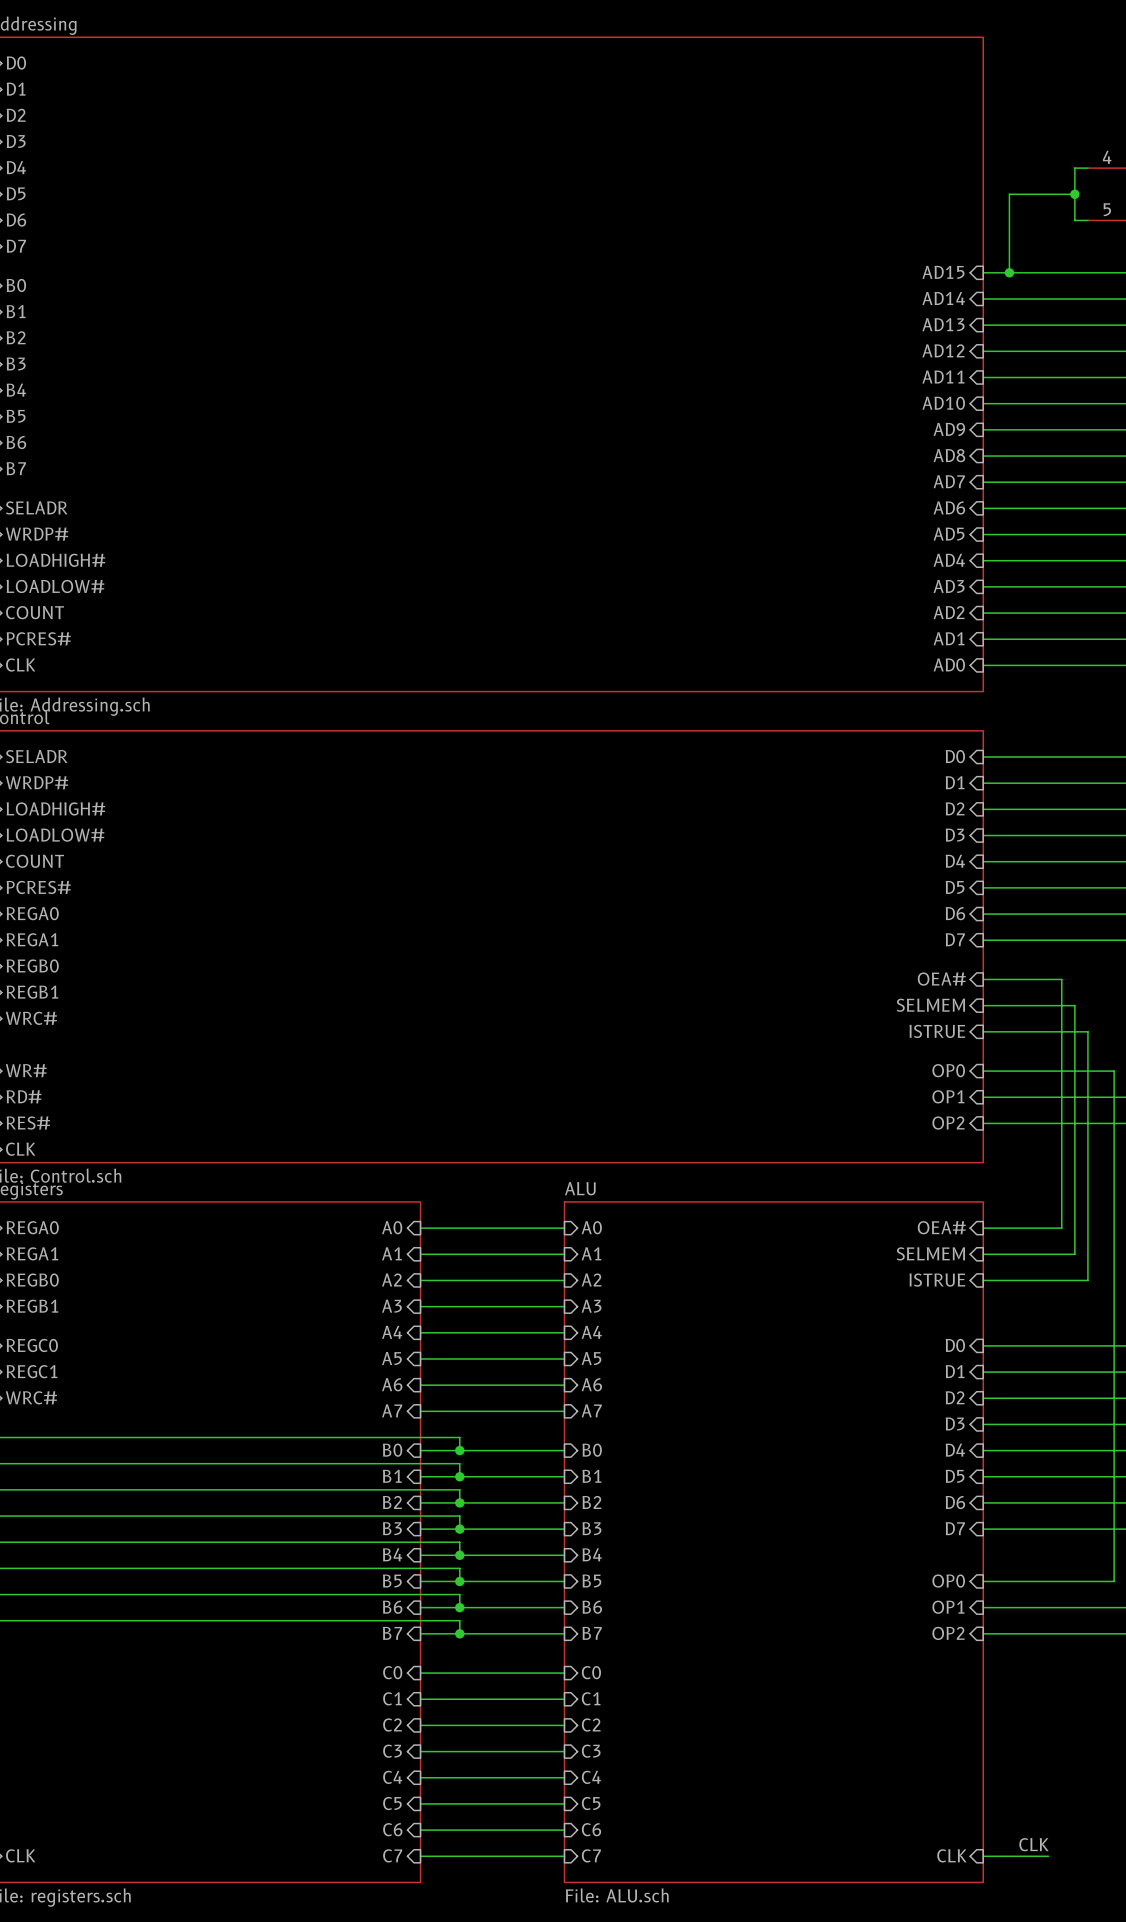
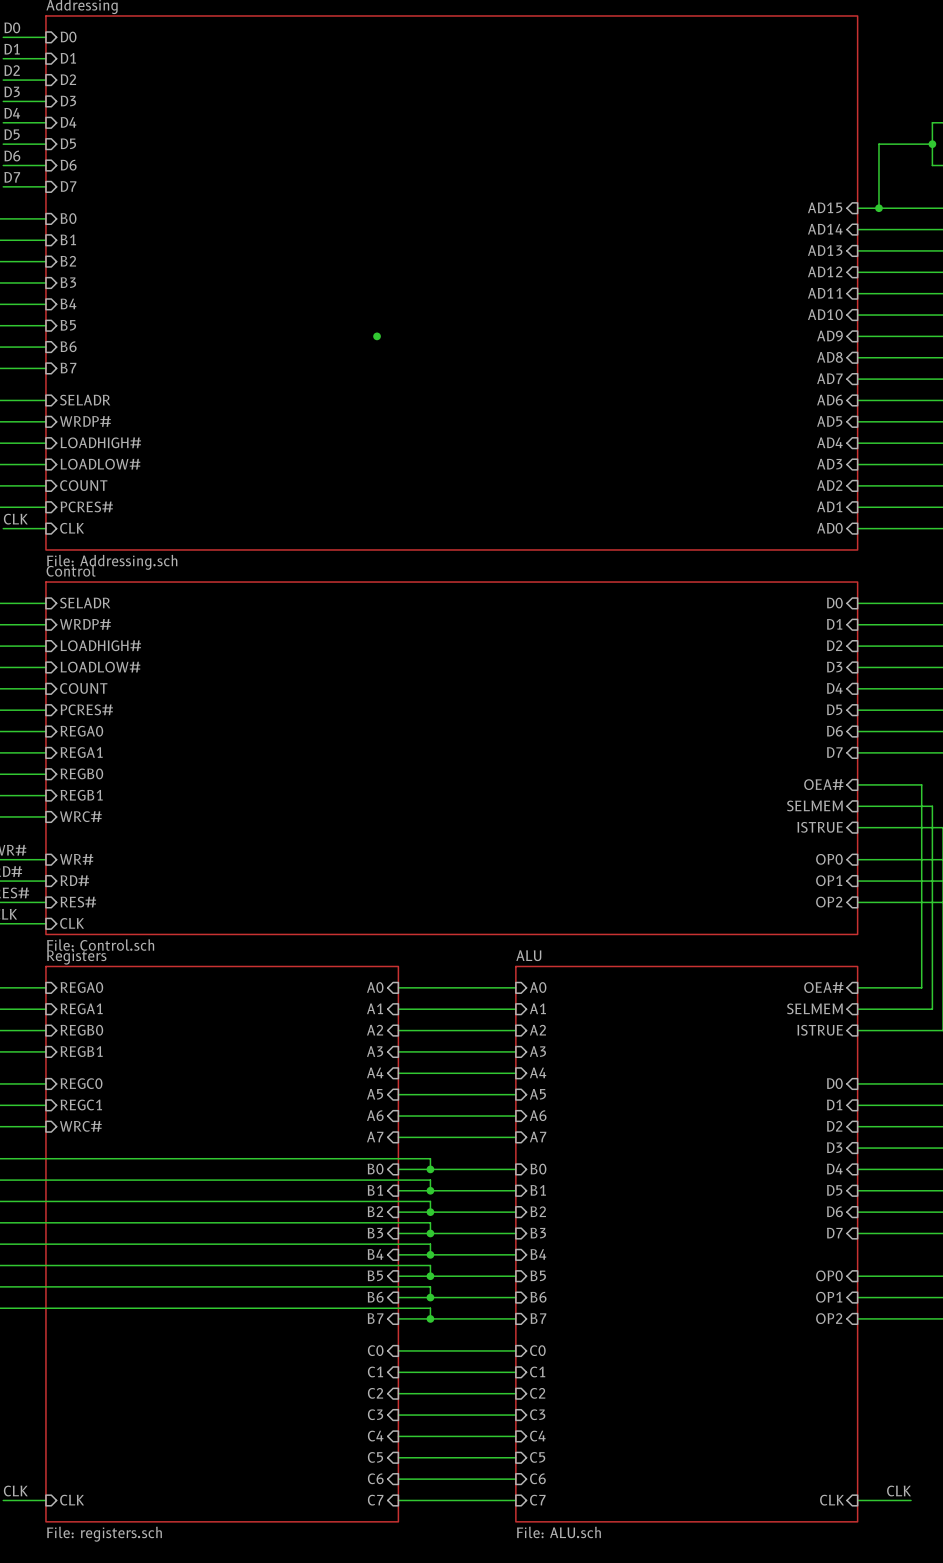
junction: none -> (377, 336)

